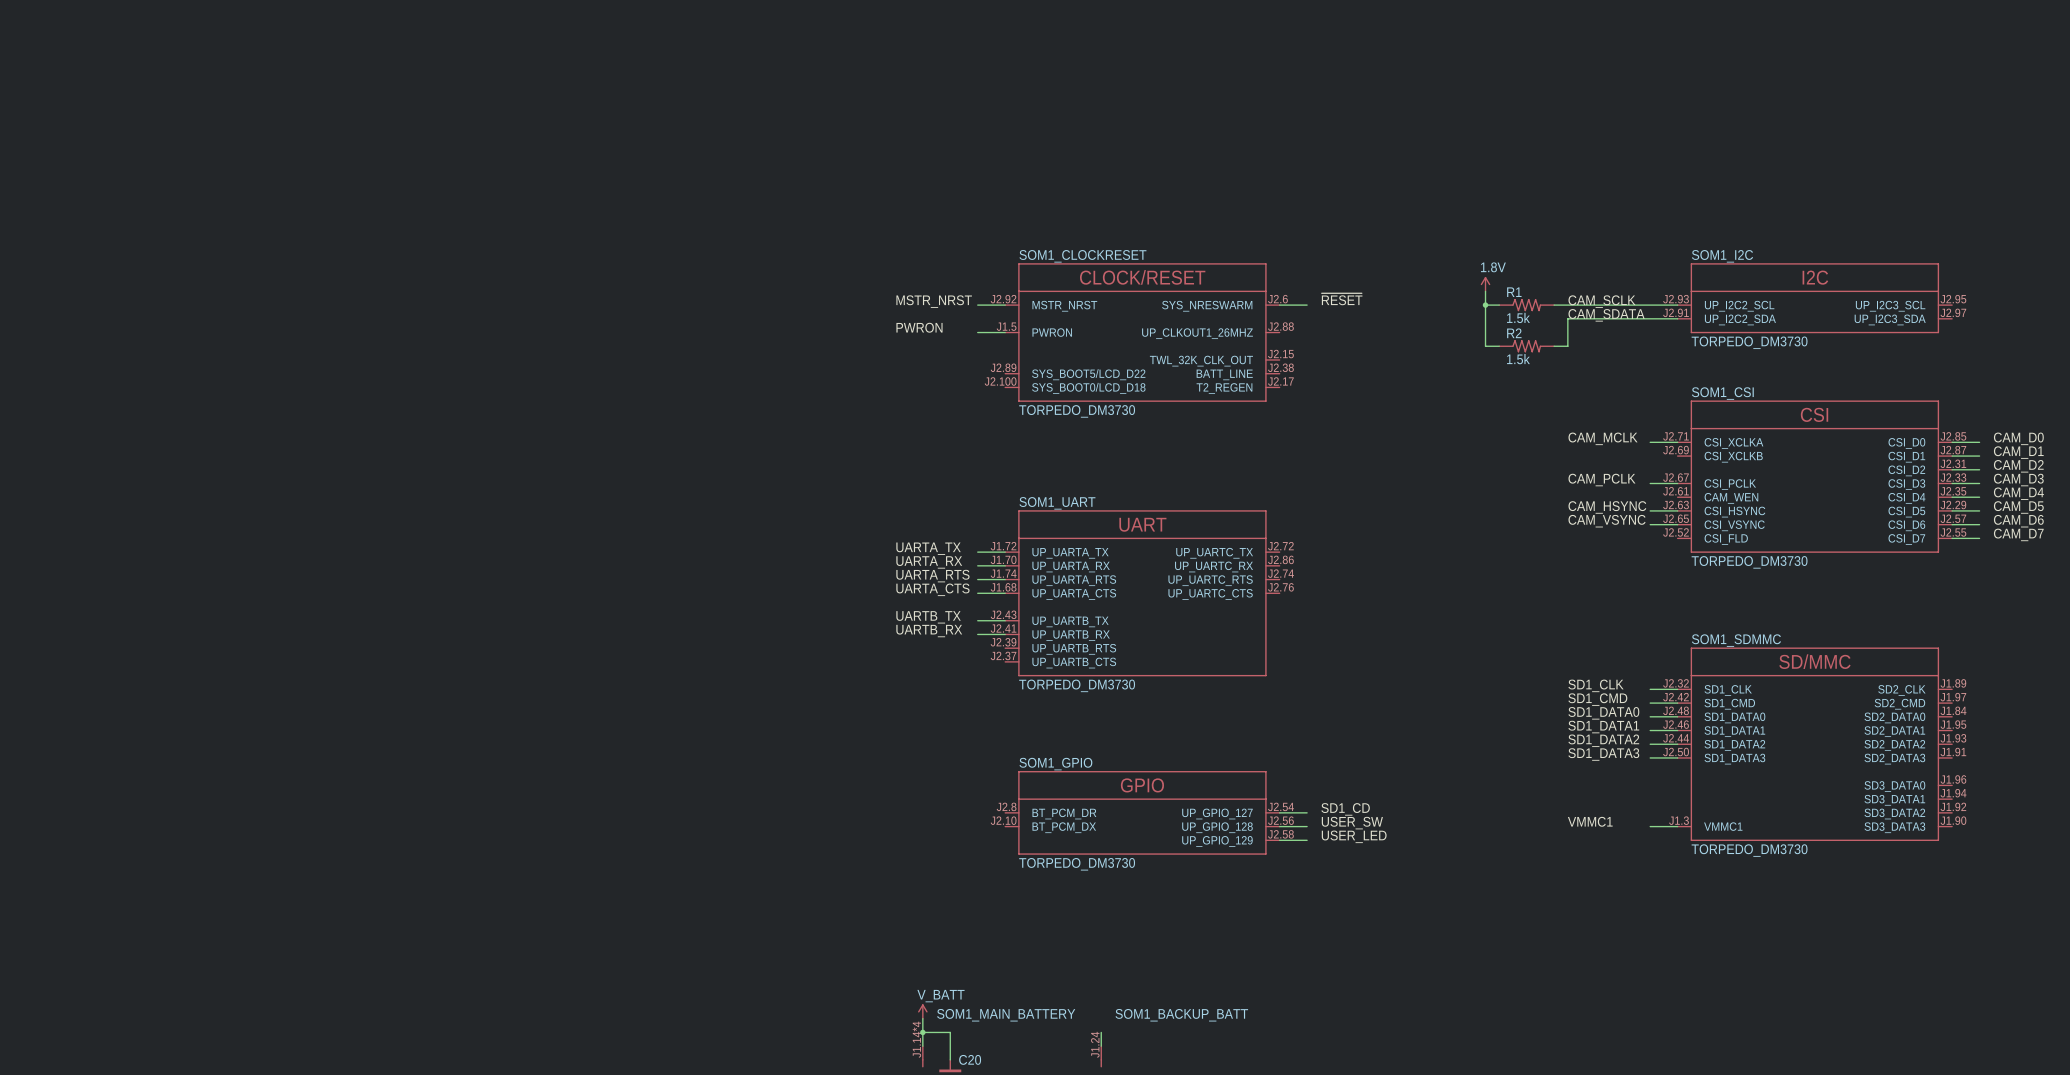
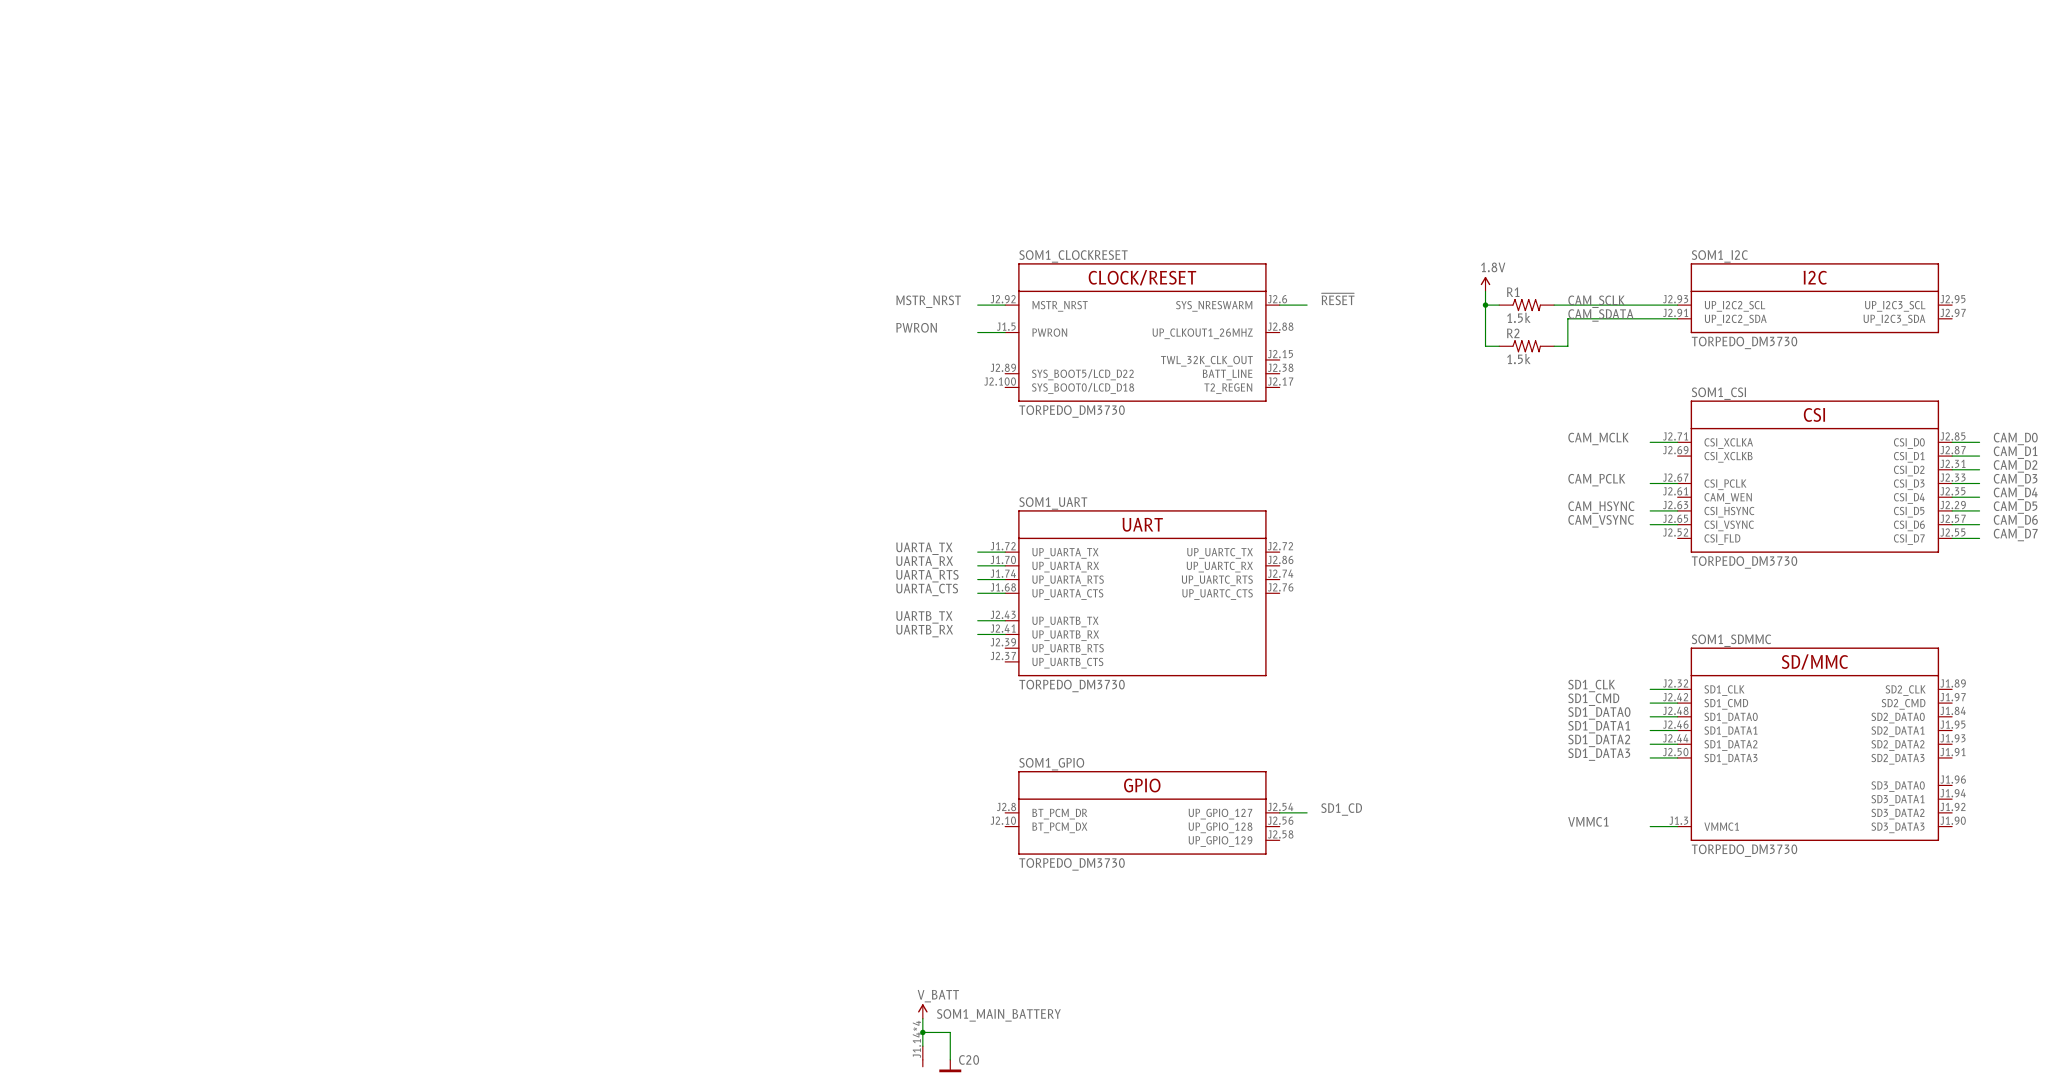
label: USER_SW (1352, 823) -> none
wire: (1279, 826) (1307, 826) -> none
label: USER_LED (1354, 836) -> none
wire: (1279, 840) (1307, 840) -> none
wire: (1101, 1032) (1101, 1046) -> none
SOM1_BACKUP_BATT: (1101, 1056) -> none

